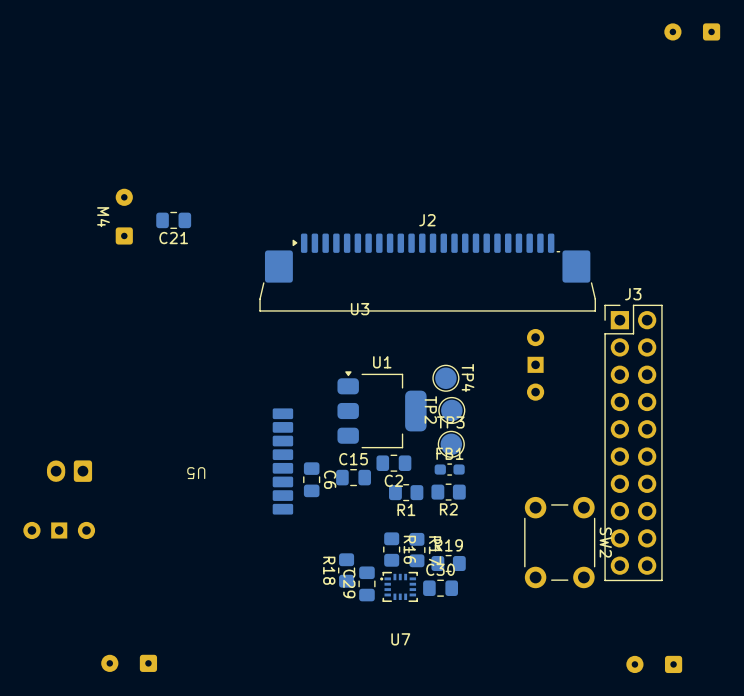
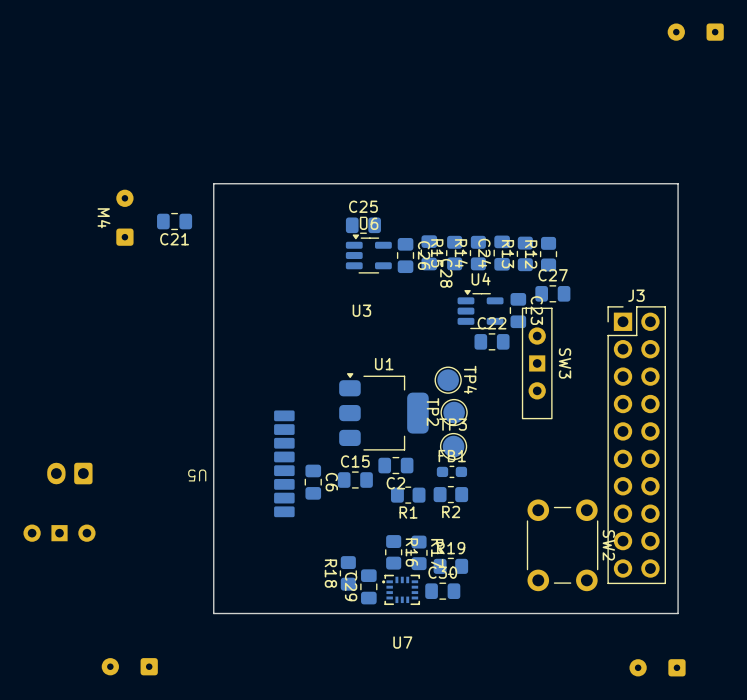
board edge: none -> (678, 183) (213, 183) (213, 613) (678, 613) (678, 183)
C25: none -> (363, 225)
C28: none -> (429, 252)
R15: none -> (454, 253)
R14: none -> (478, 253)
C24: none -> (502, 253)
U6: none -> (368, 254)
R13: none -> (525, 253)
R12: none -> (548, 254)
C26: none -> (405, 255)
J2: (427, 272) -> none
C27: none -> (552, 293)
U4: none -> (480, 309)
C23: none -> (518, 310)
C22: none -> (492, 341)
SW3 side: top (535, 364) -> bottom (537, 363)

